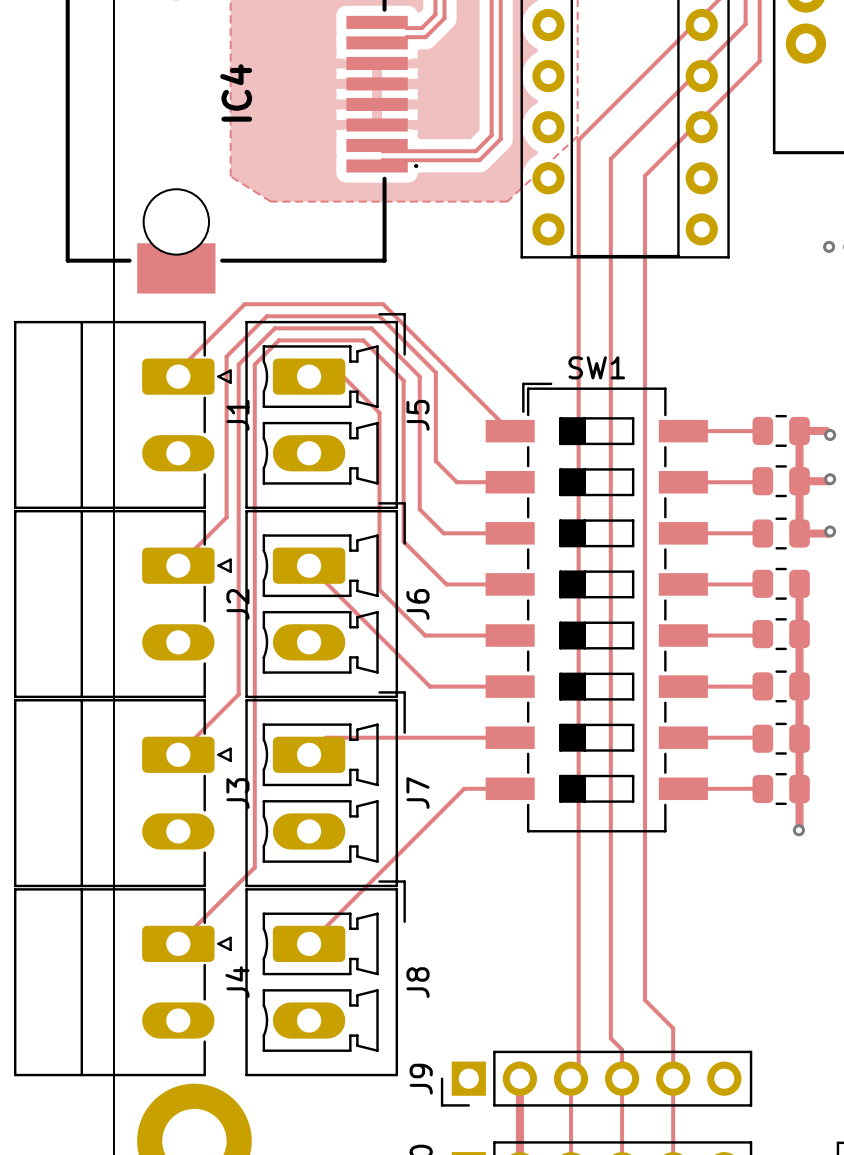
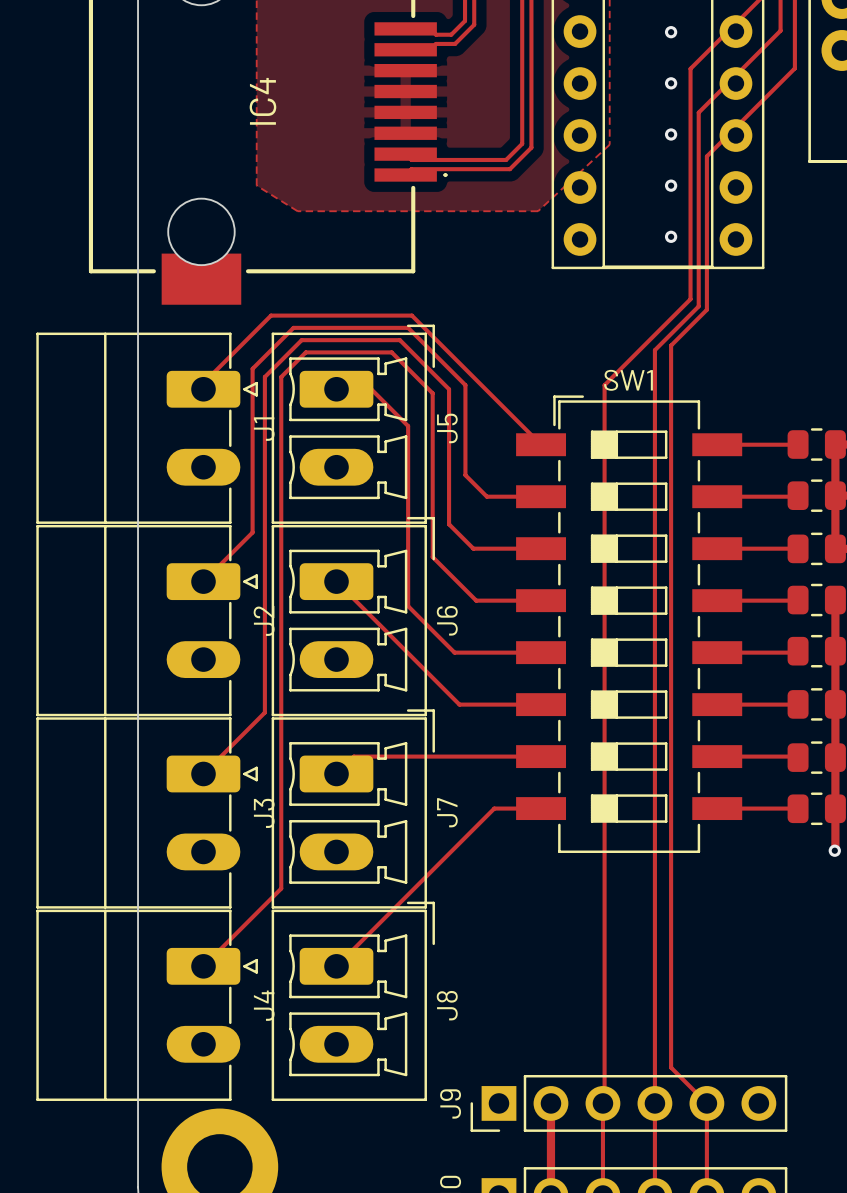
via: none -> (671, 32)
track: (657, 61) (578, 140) (578, 1071) (572, 1077) -> (690, 68) (690, 299) (604, 385) (604, 1101)
via: none -> (671, 83)
track: (665, 104) (610, 158) (610, 1038) (622, 1049) -> (698, 112) (698, 306) (654, 350) (654, 1073)
via: none -> (671, 134)
track: (673, 147) (645, 175) (645, 1000) (673, 1028) (673, 1078) -> (706, 156) (706, 309) (671, 345) (671, 1067) (706, 1103)
via: none -> (671, 185)
via: none -> (671, 236)

